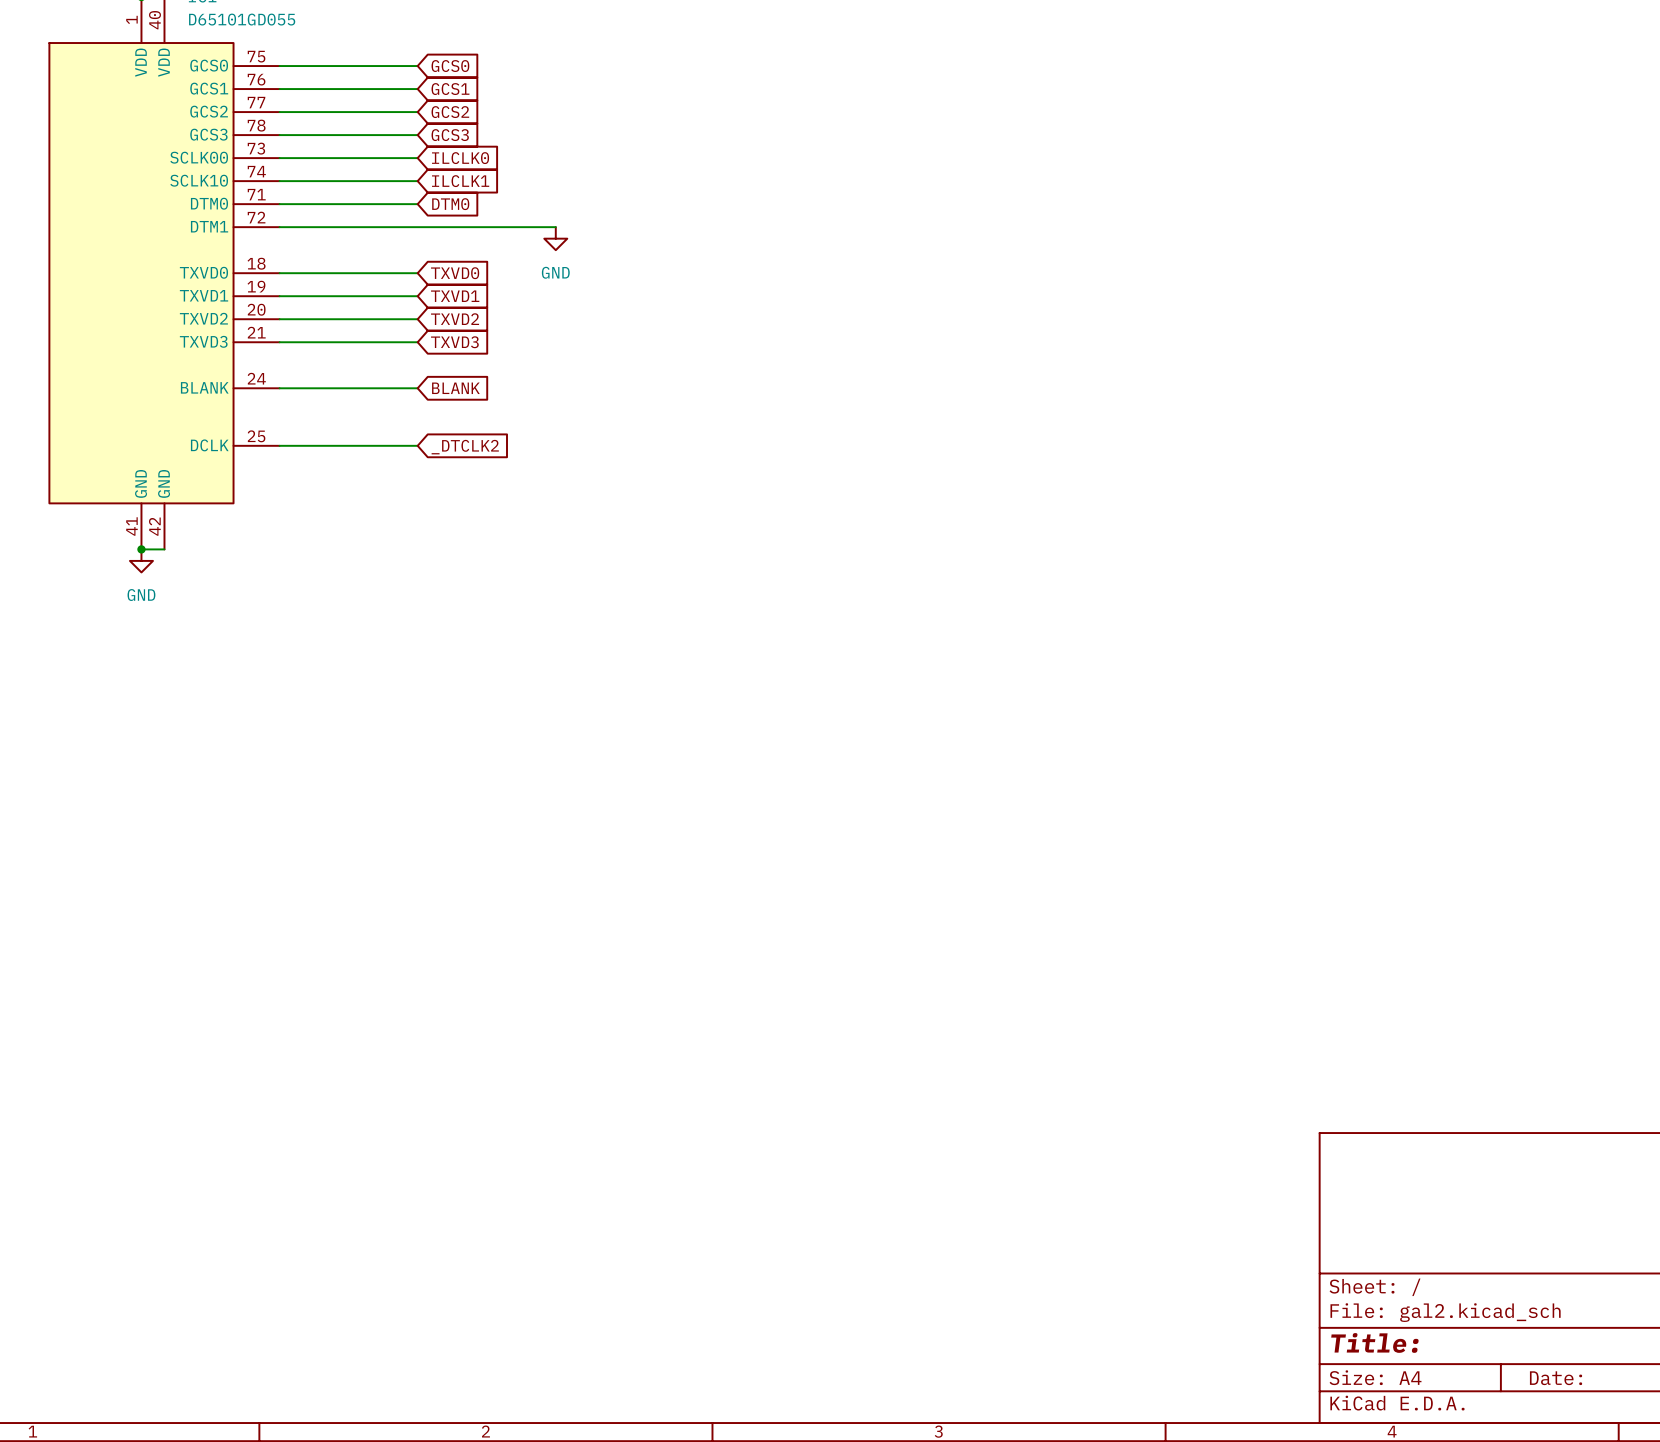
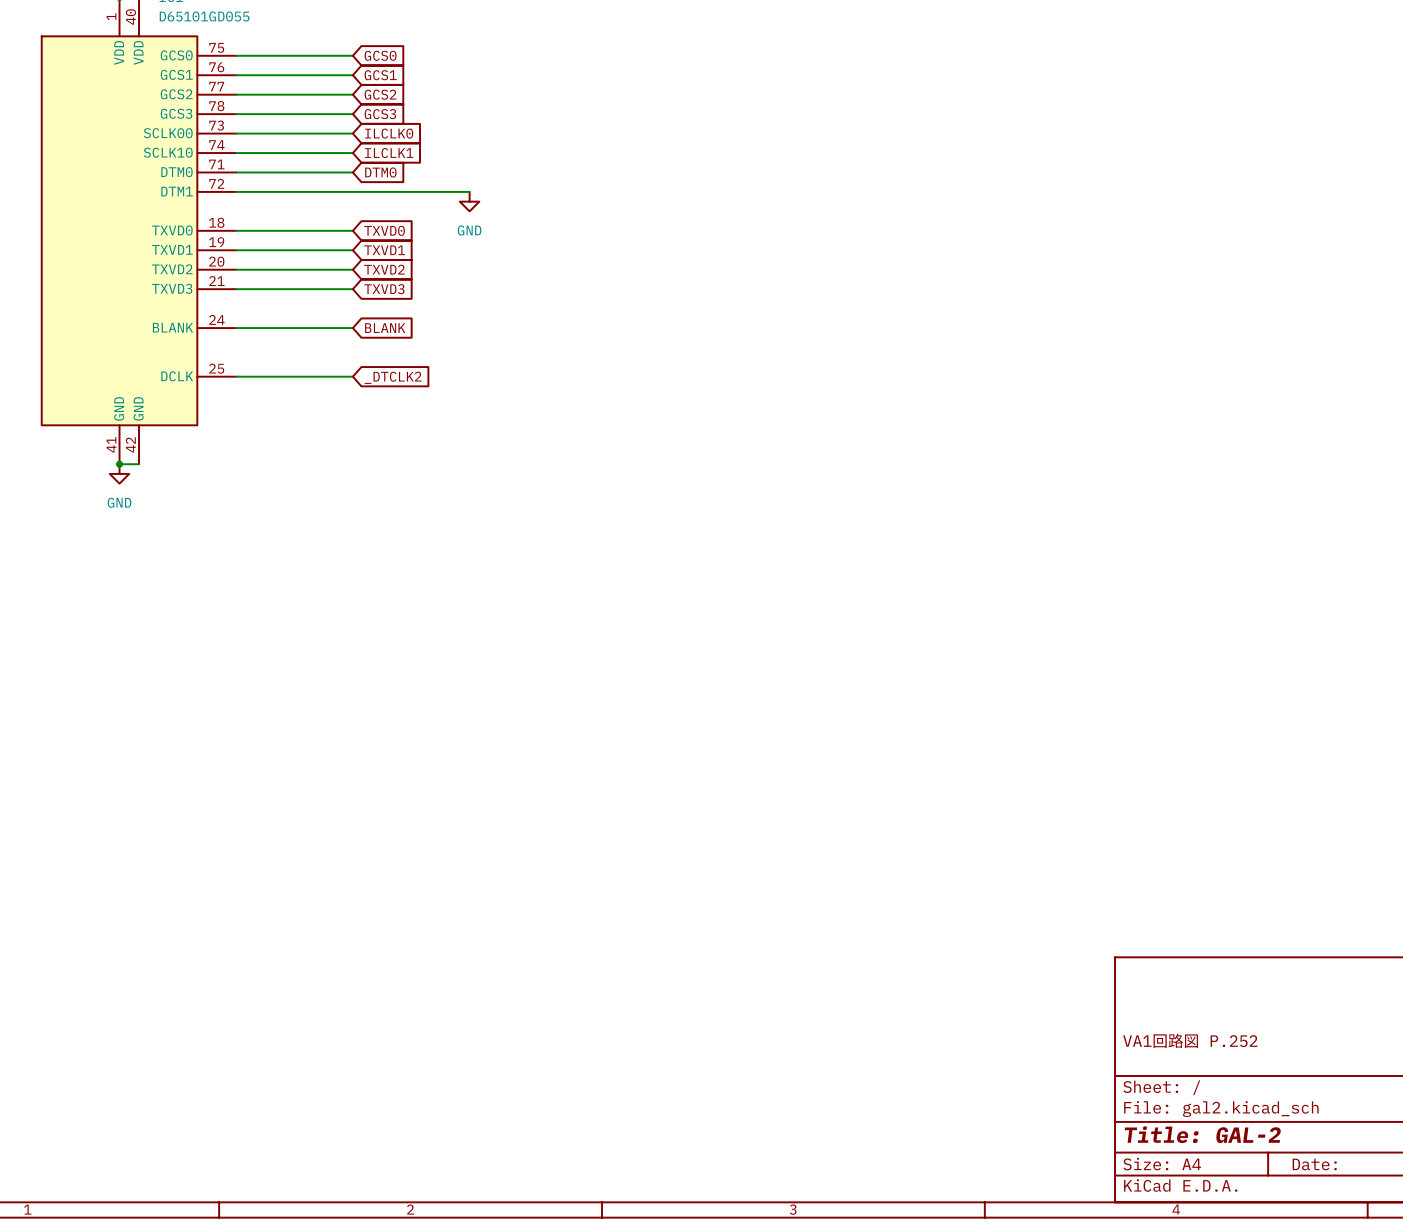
title block: none -> VA1回路図 P.252 (1190, 1040)
title block: Title: (1374, 1342) -> Title: GAL-2 (1202, 1134)

